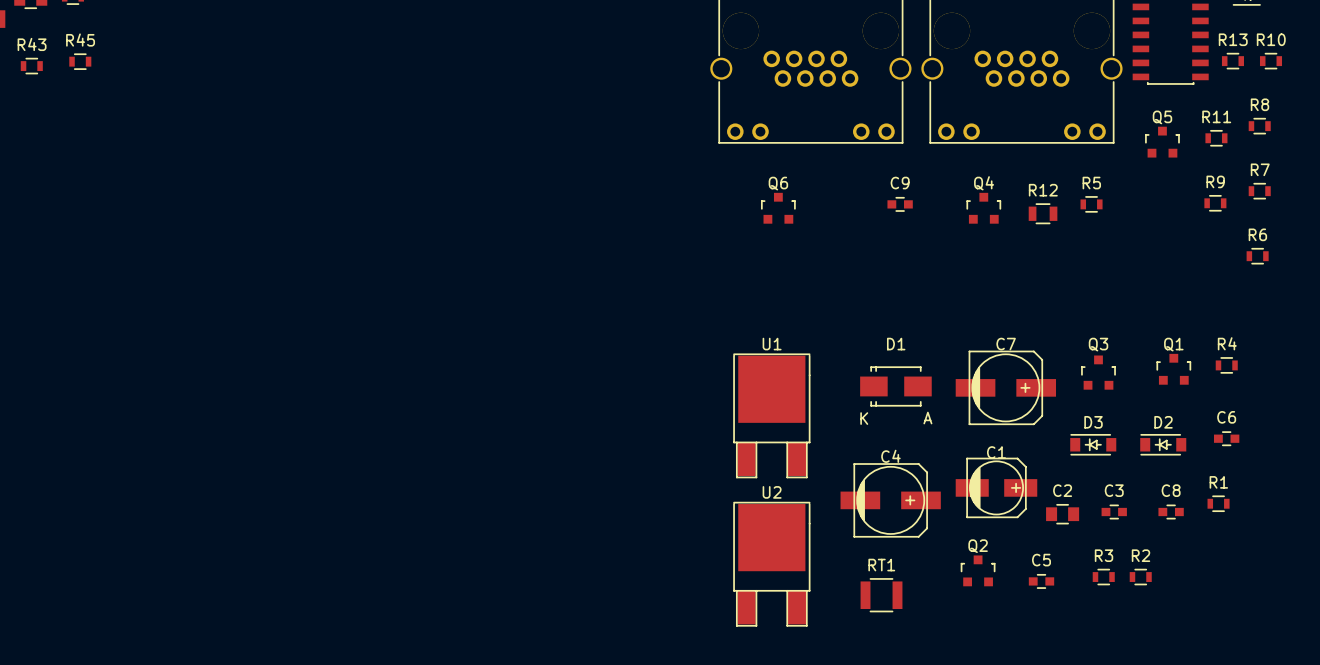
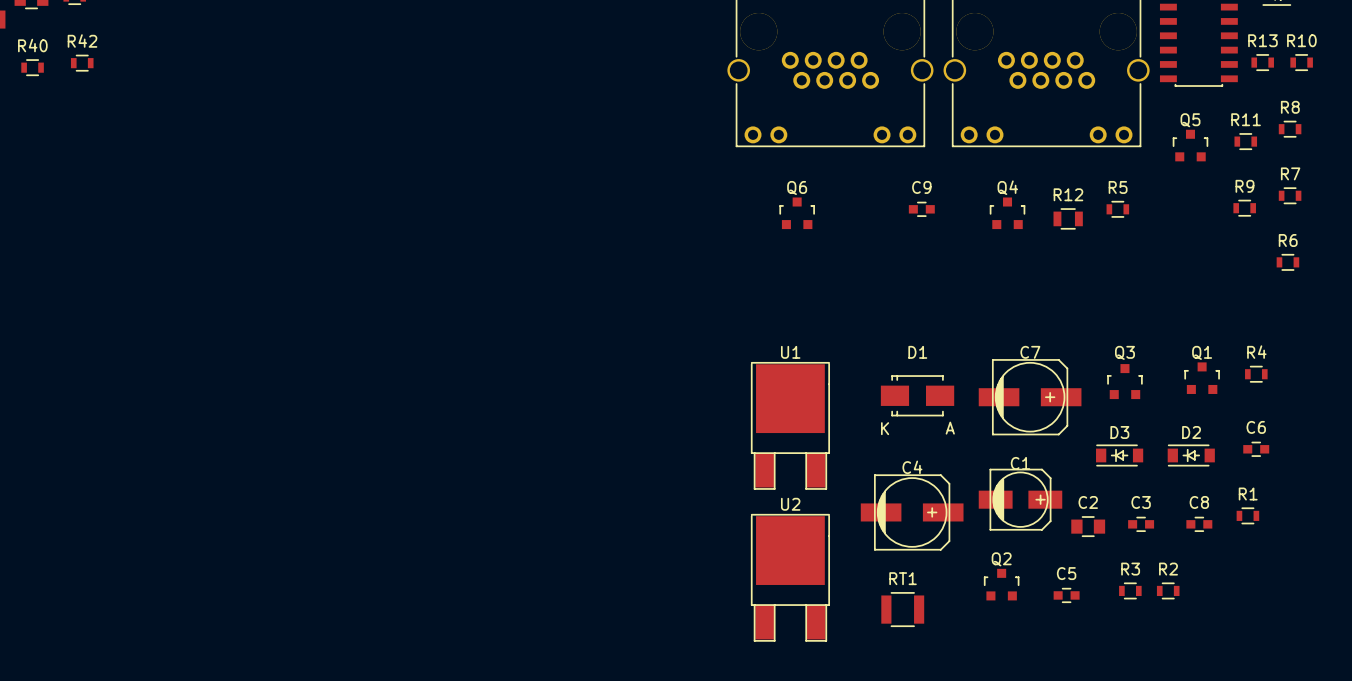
R45 name: R45 (80, 40) -> R42 (82, 41)
R43 name: R43 (32, 44) -> R40 (32, 45)

